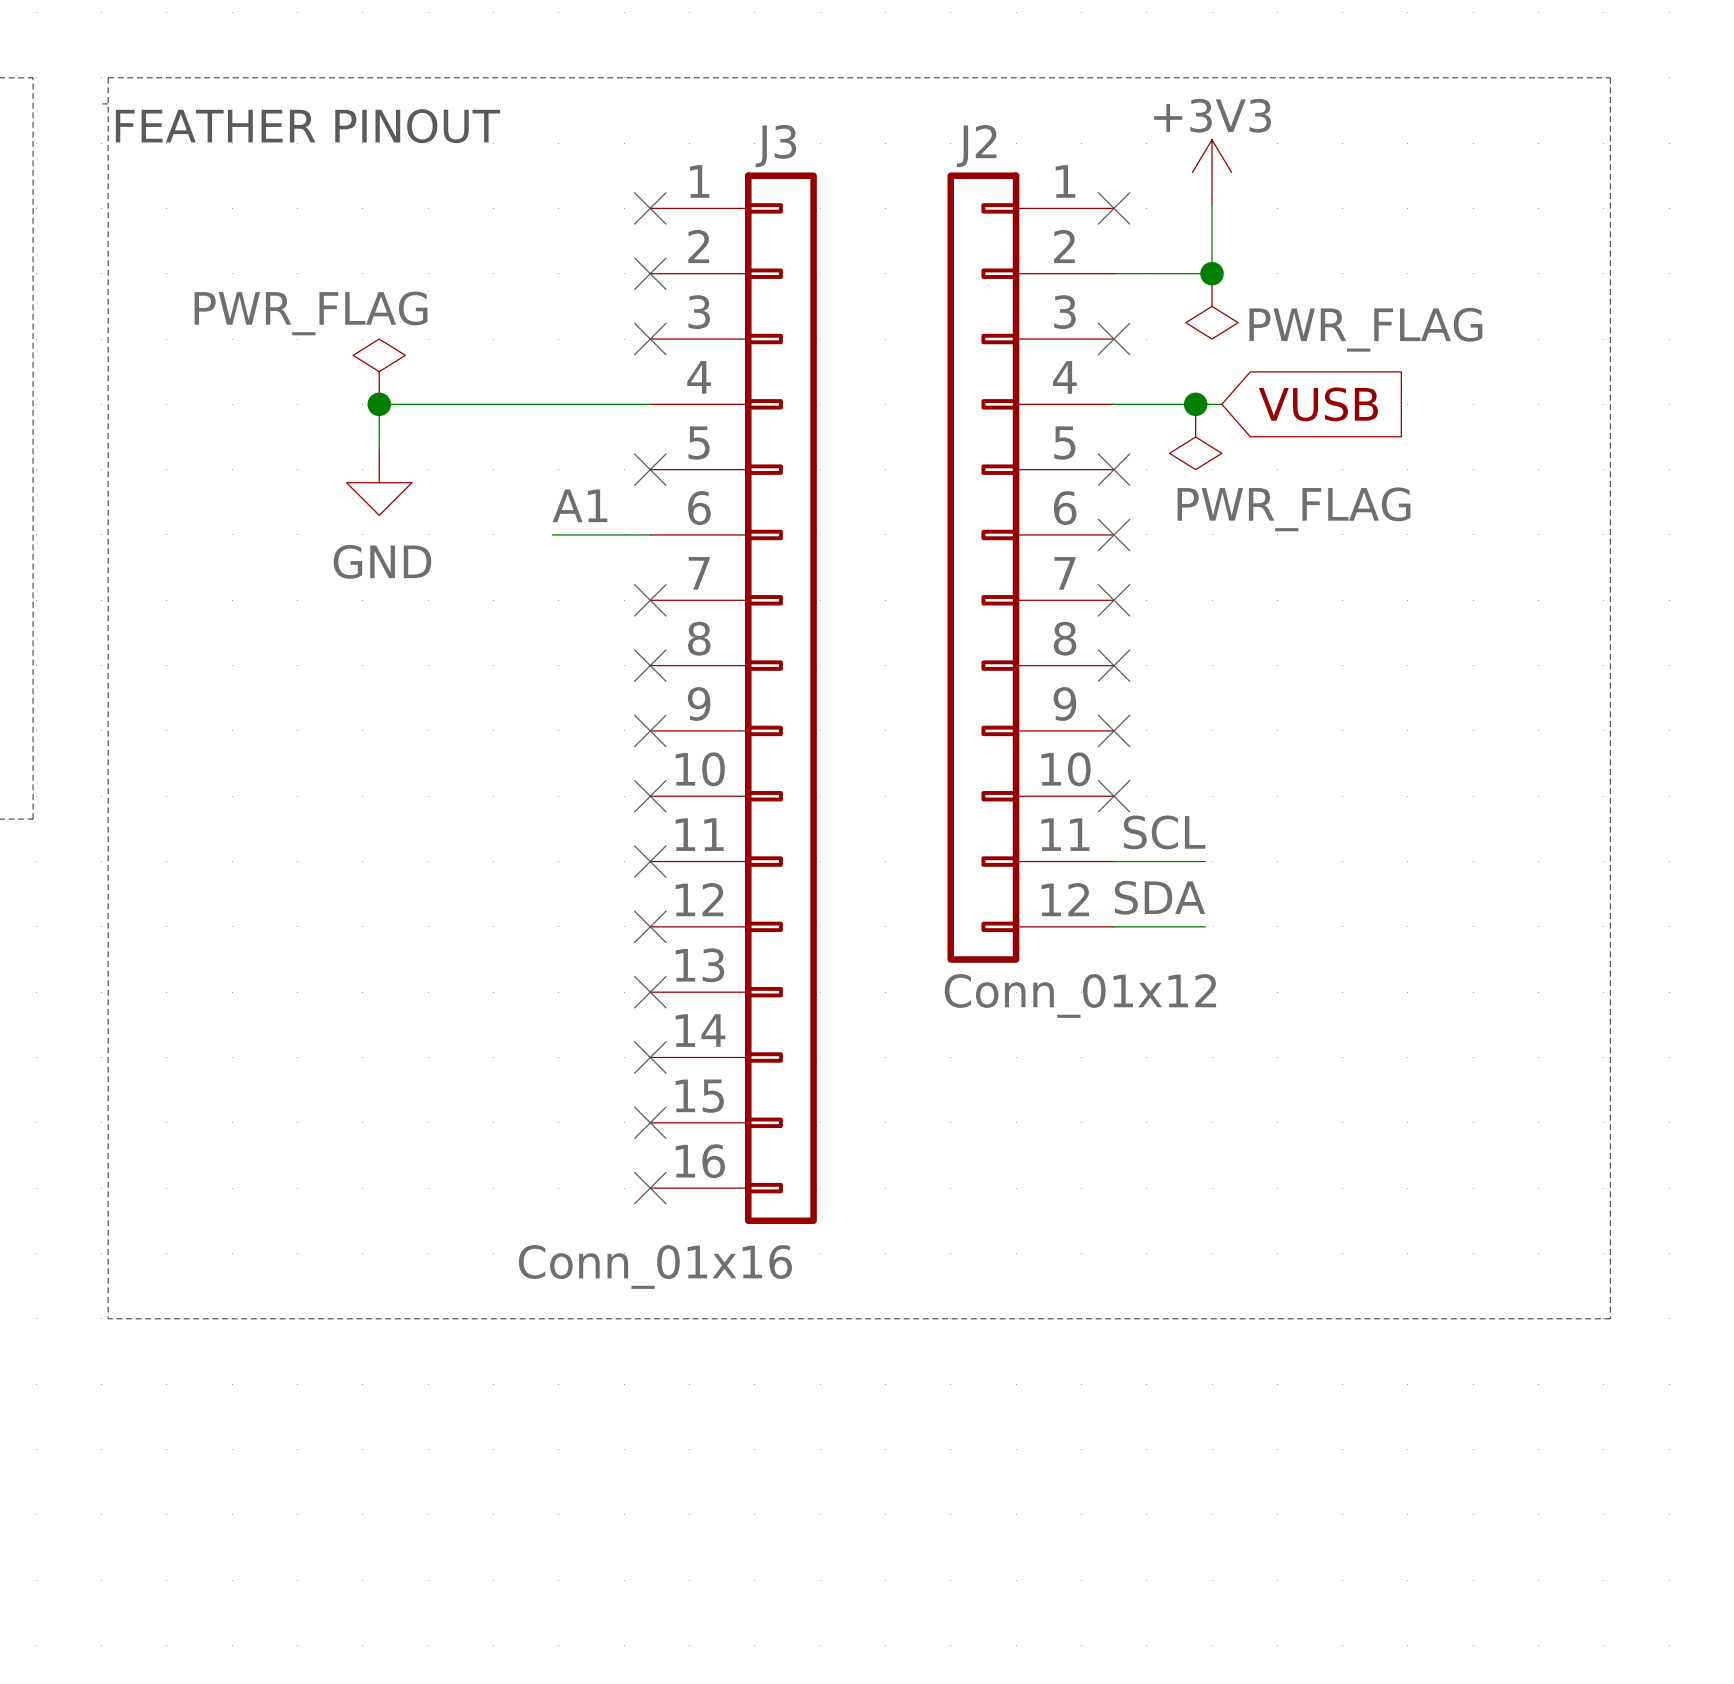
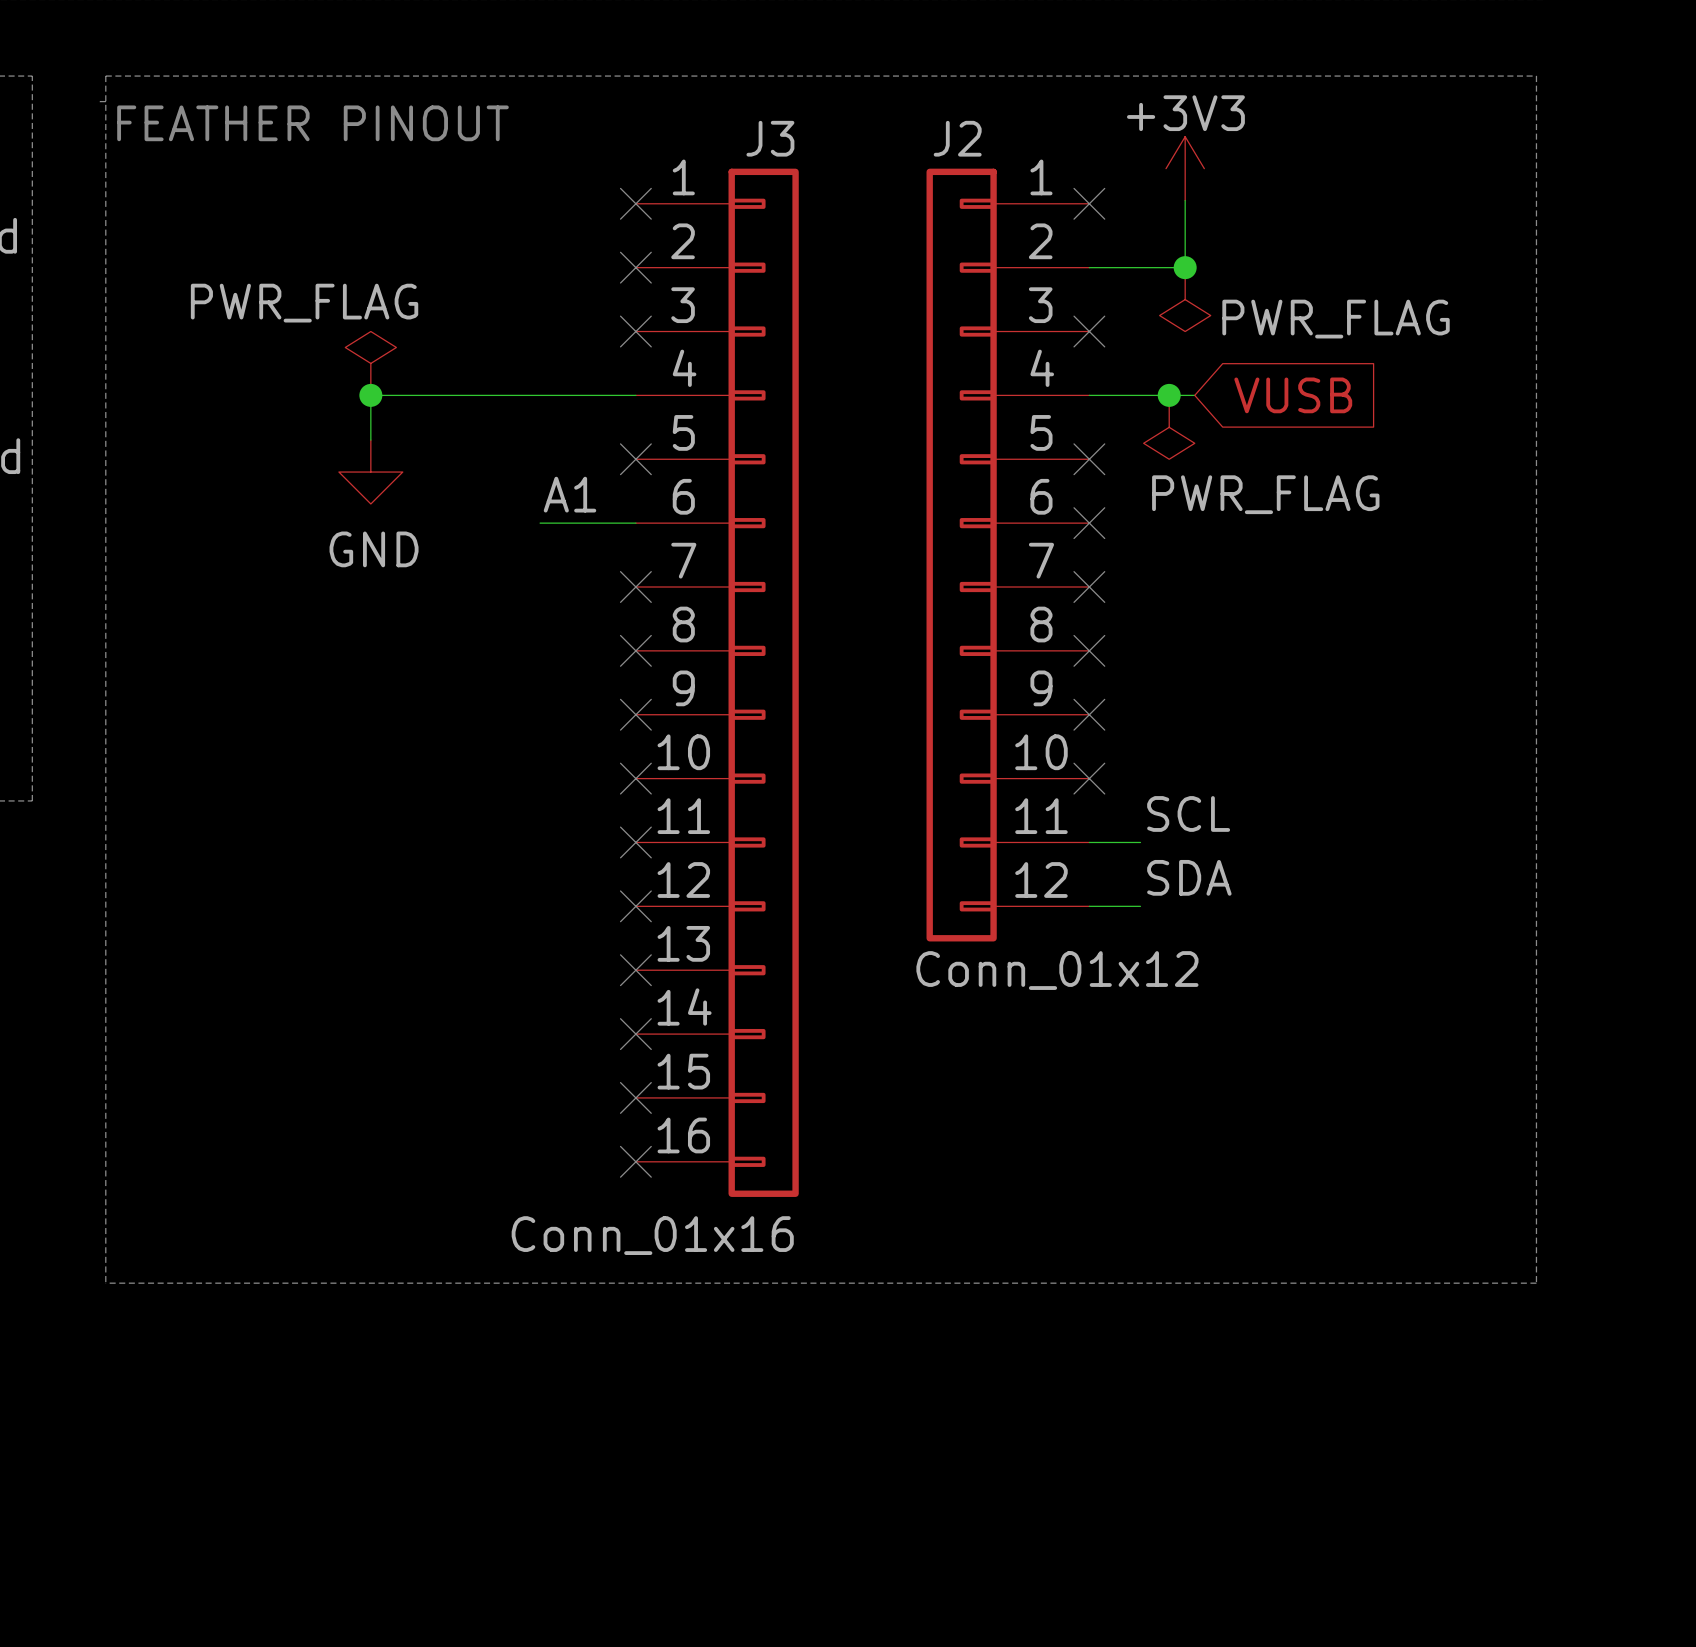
line: (1571, 77) (1610, 77) (1610, 1318) (108, 1318) (108, 1312) -> (1536, 76) (1536, 1283) (105, 1283)
label position: SCL (1164, 832) -> SCL (1188, 813)
wire: (1166, 861) (1205, 861) -> none
label position: SDA (1159, 897) -> SDA (1189, 877)
wire: (1166, 926) (1205, 926) -> none

